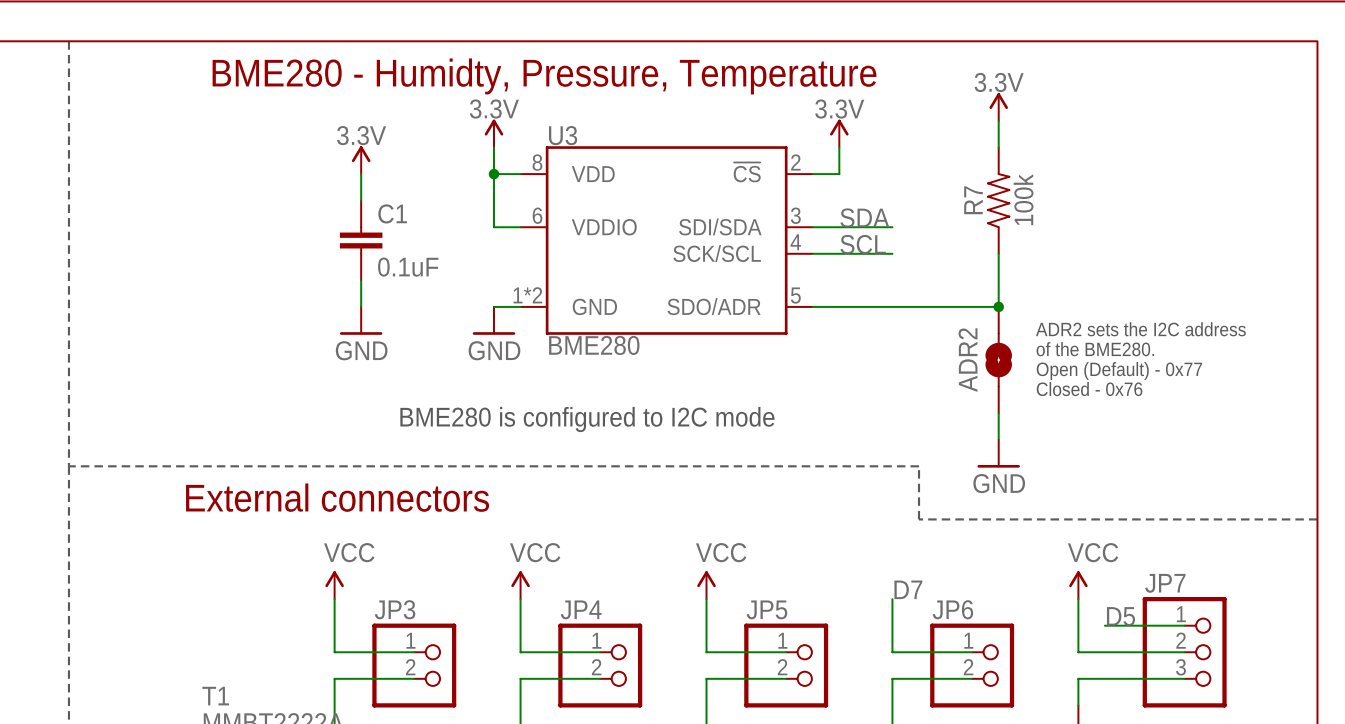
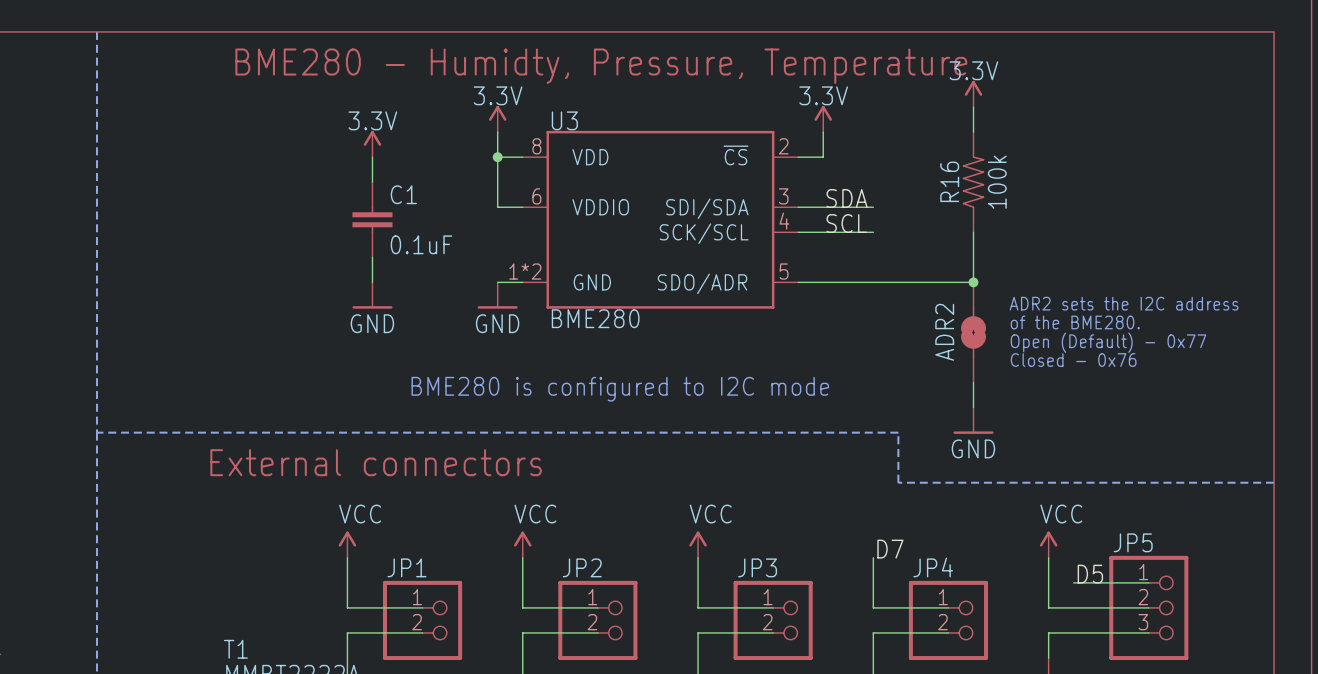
R7 name: R7 (973, 200) -> R16 (949, 181)
JP7 name: JP7 (1165, 583) -> JP5 (1133, 542)
JP3 name: JP3 (395, 609) -> JP1 (406, 567)
JP4 name: JP4 (581, 609) -> JP2 (582, 567)
JP5 name: JP5 (766, 609) -> JP3 (757, 567)
JP6 name: JP6 (952, 609) -> JP4 (933, 567)

